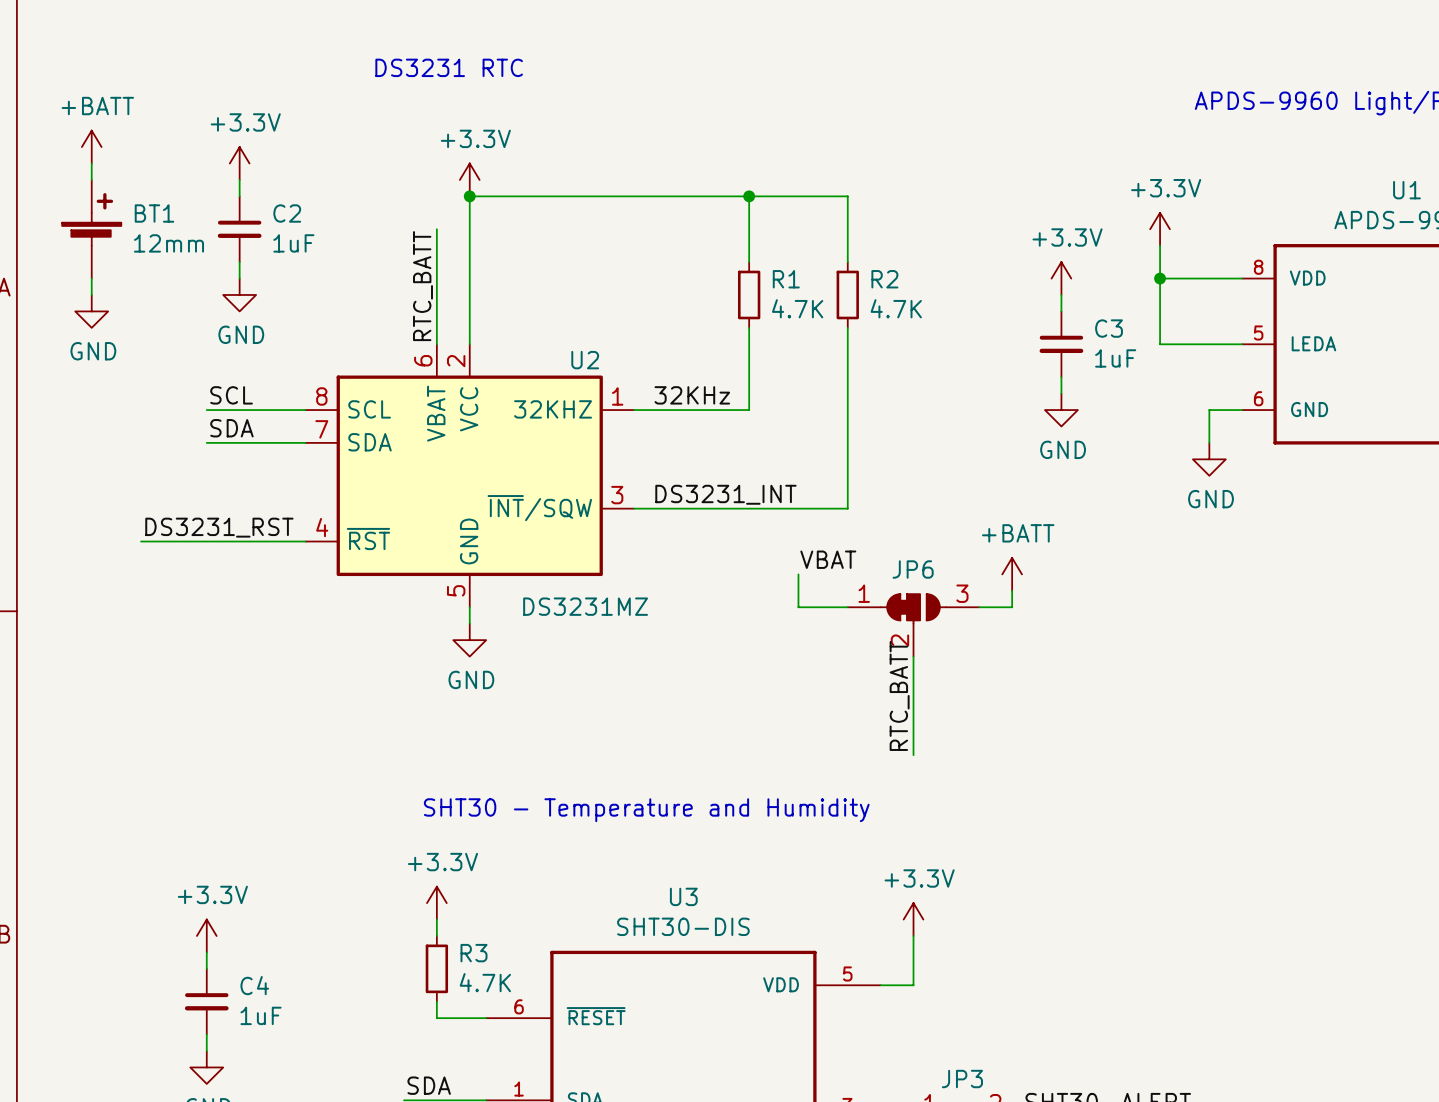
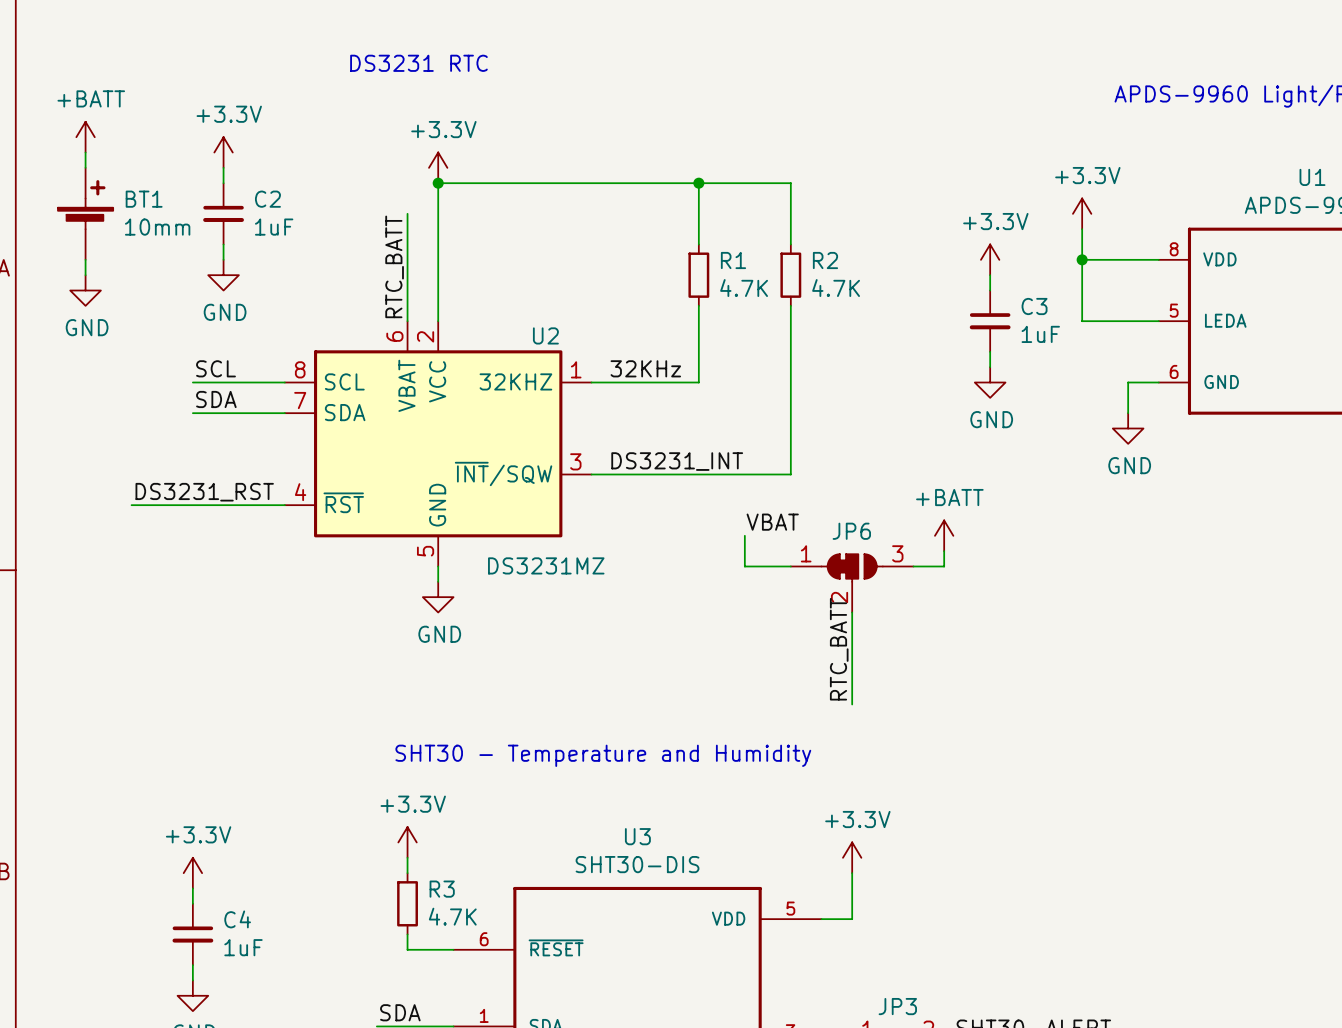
BT1 value: 12mm (168, 243) -> 10mm (157, 227)

